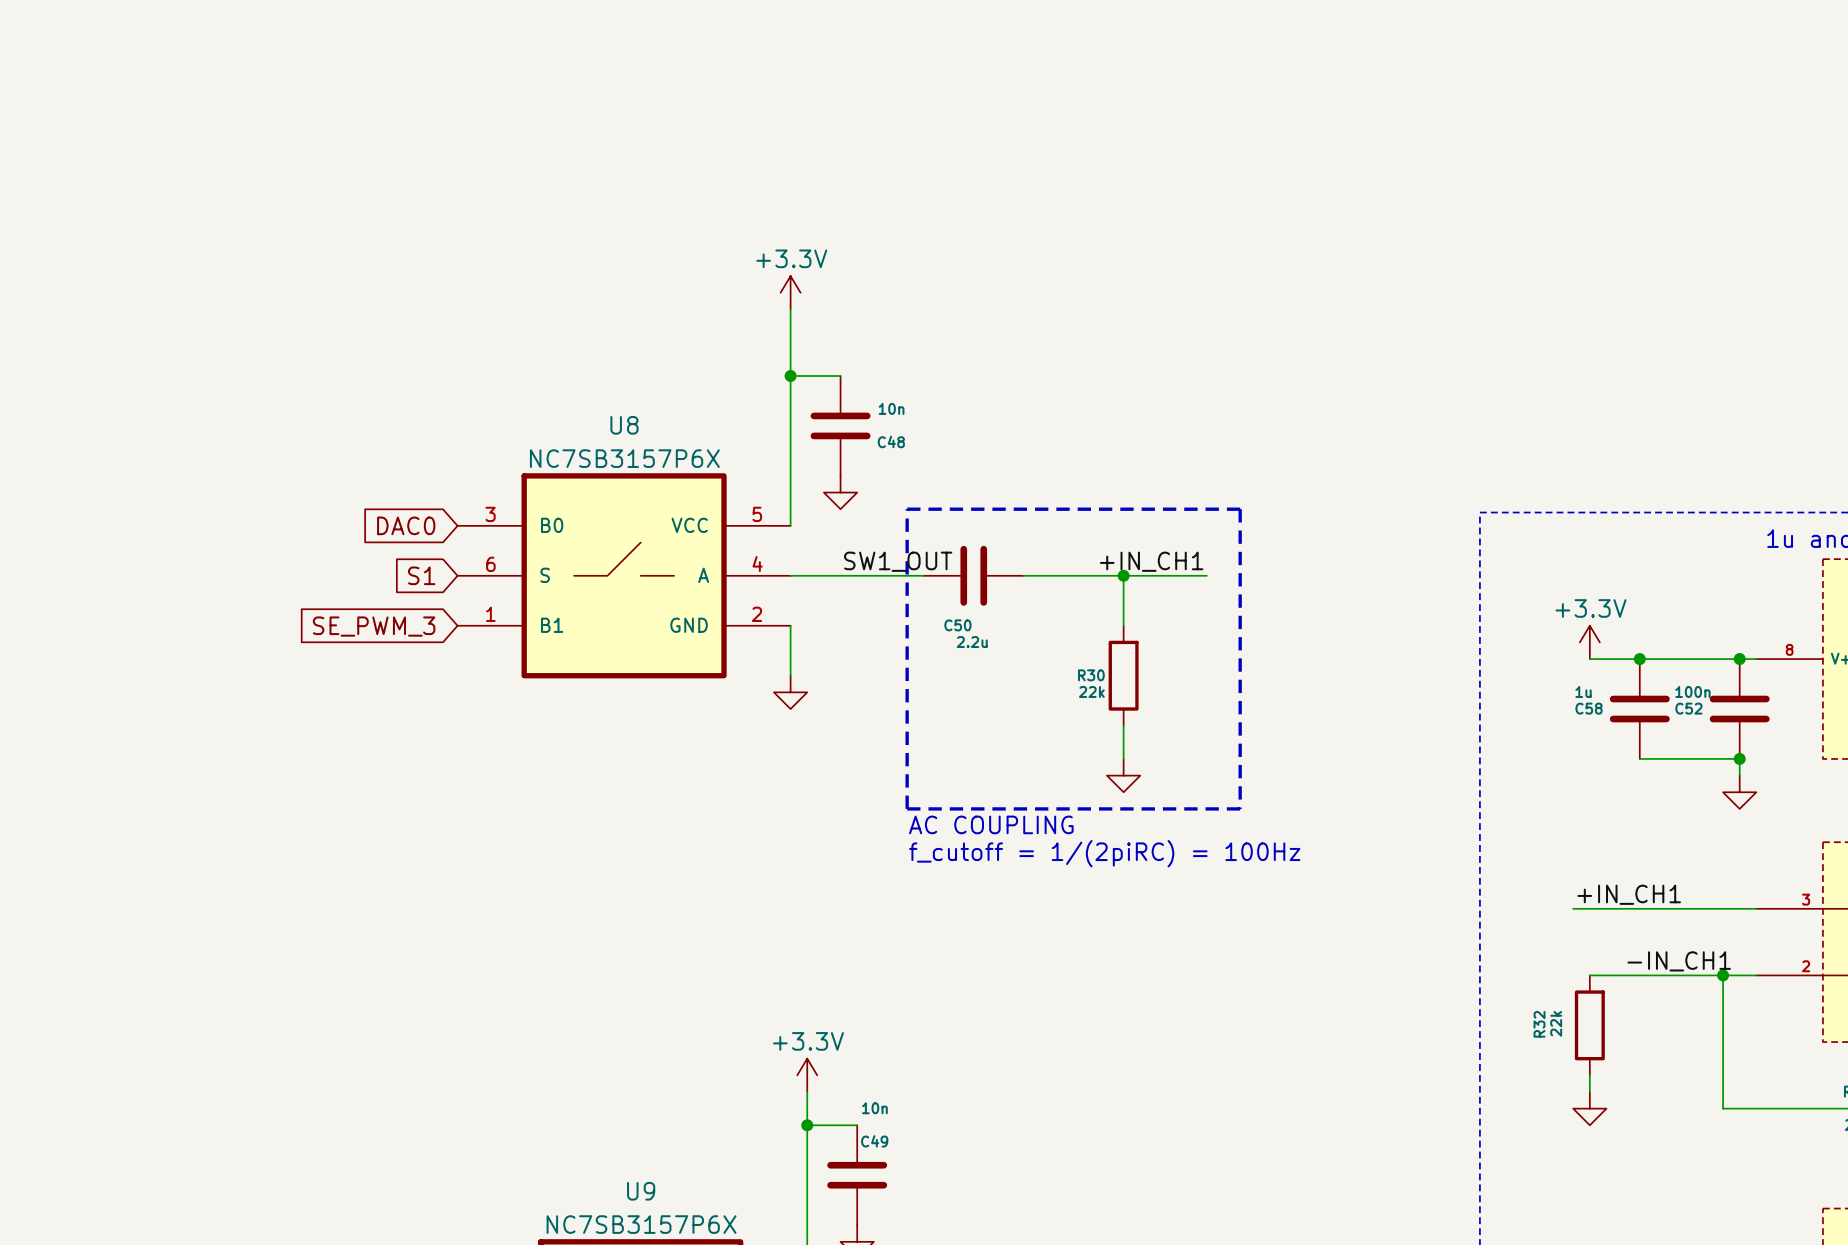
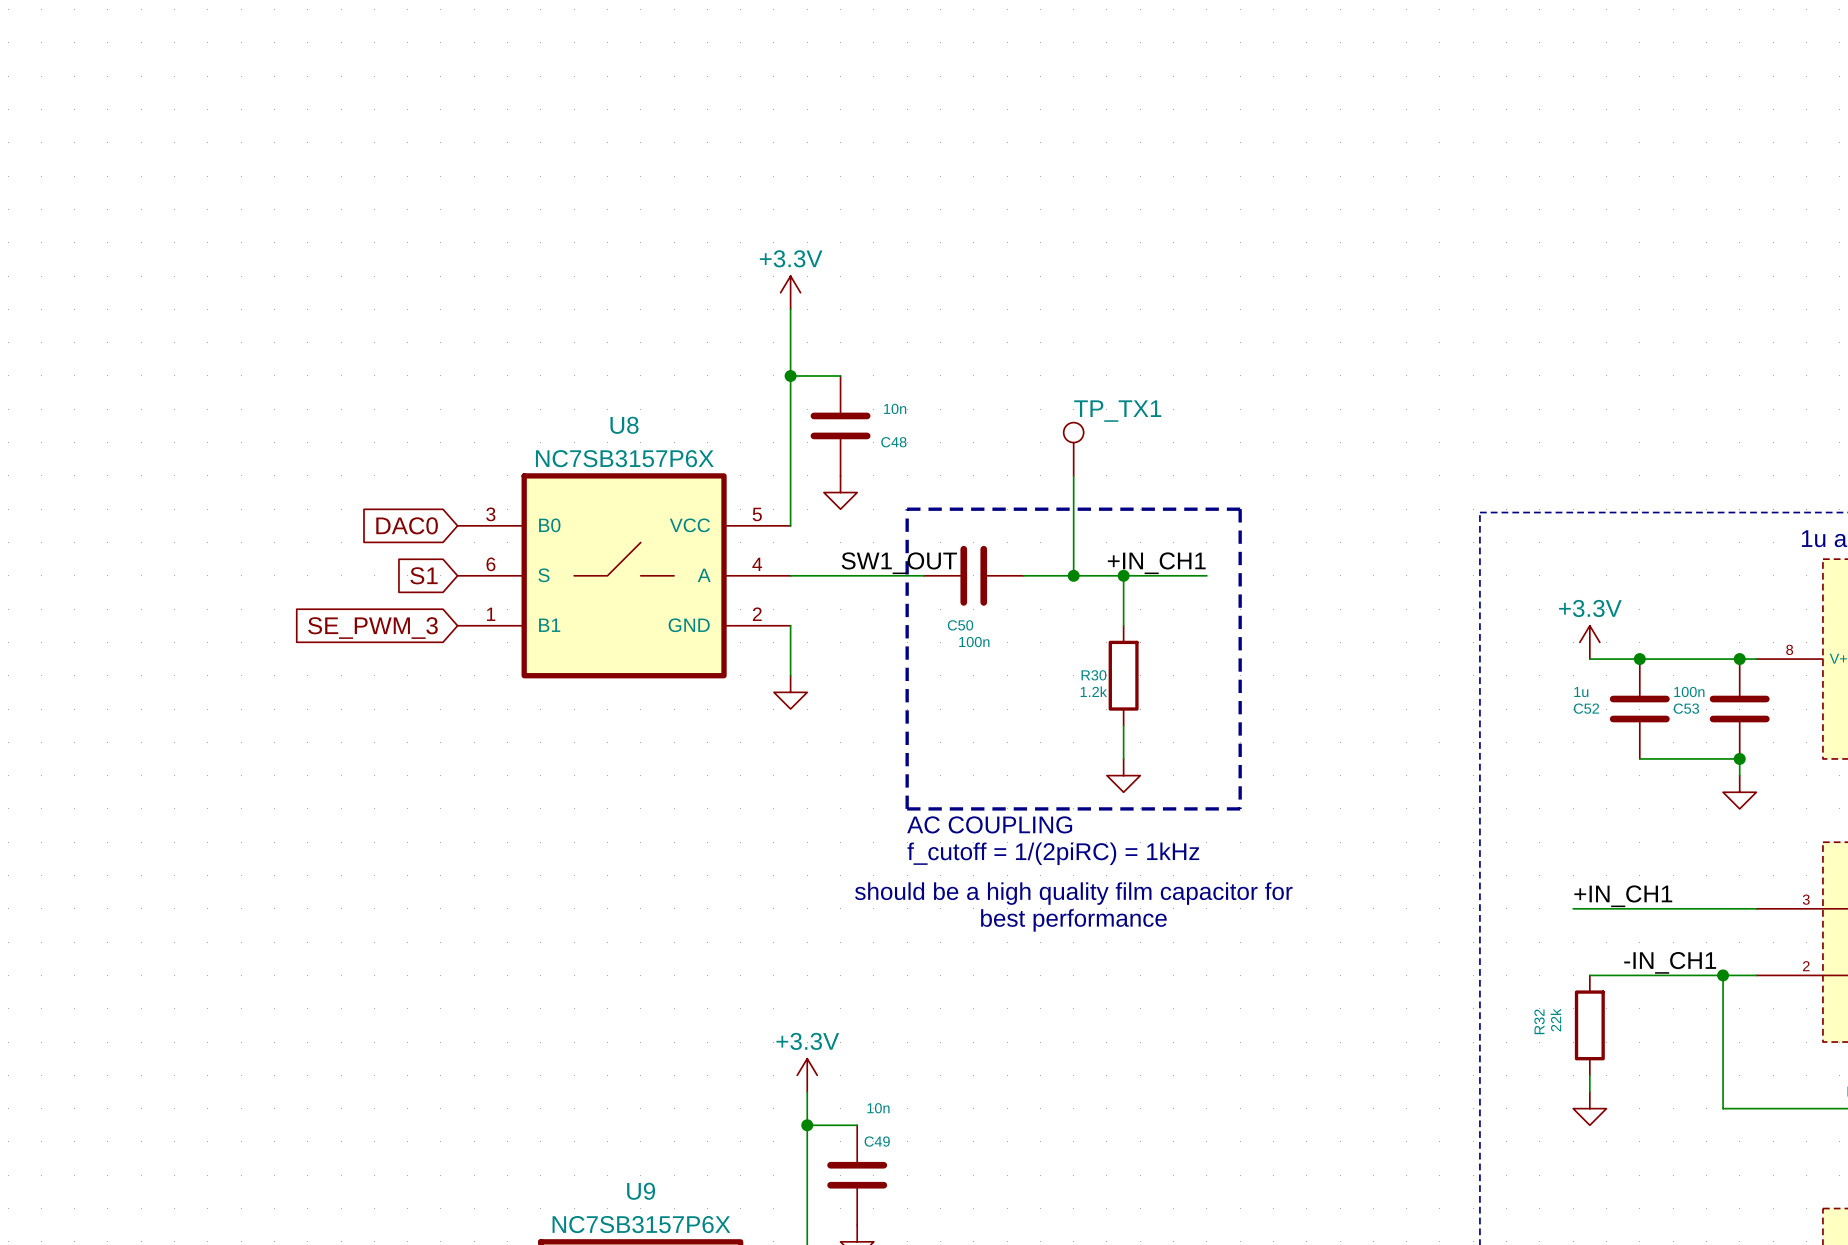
TP_TX1: none -> (1073, 449)
wire: none -> (1073, 475) (1073, 575)
junction: none -> (1073, 575)
C50 value: 2.2u (972, 642) -> 100n (974, 642)
R30 value: 22k (1091, 691) -> 1.2k (1093, 691)
C58 name: C58 (1589, 708) -> C52 (1586, 708)
C52 name: C52 (1688, 708) -> C53 (1686, 708)
text: f_cutoff = 1/(2piRC) = 100Hz (1104, 853) -> f_cutoff = 1/(2piRC) = 1kHz (1053, 853)
text: none -> should be a high quality film capacitor for (1073, 893)
text: none -> best performance (1073, 920)

